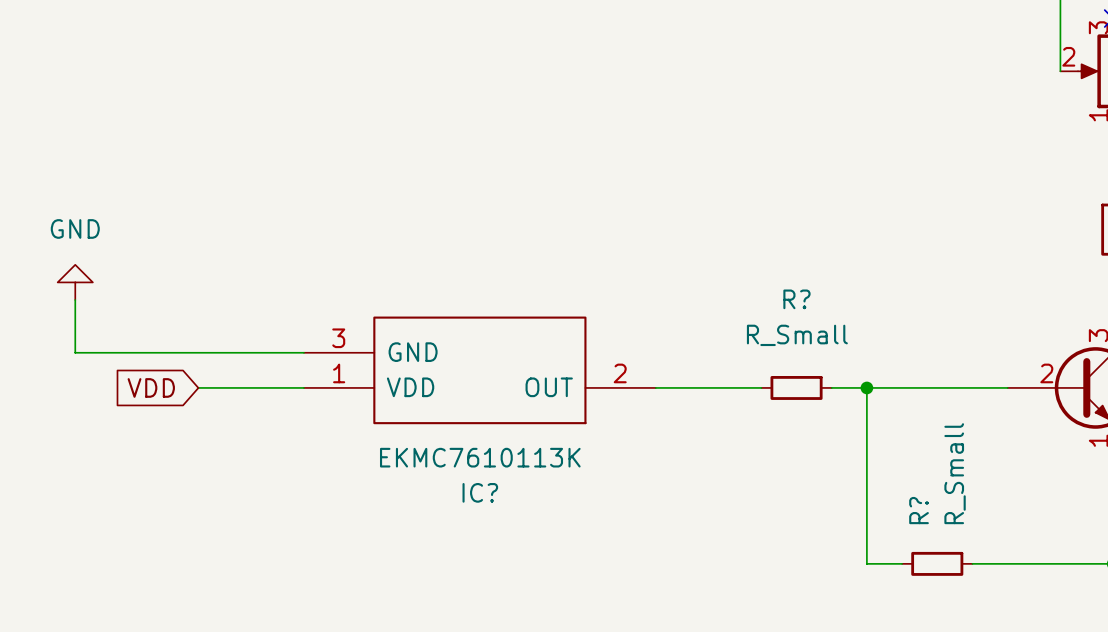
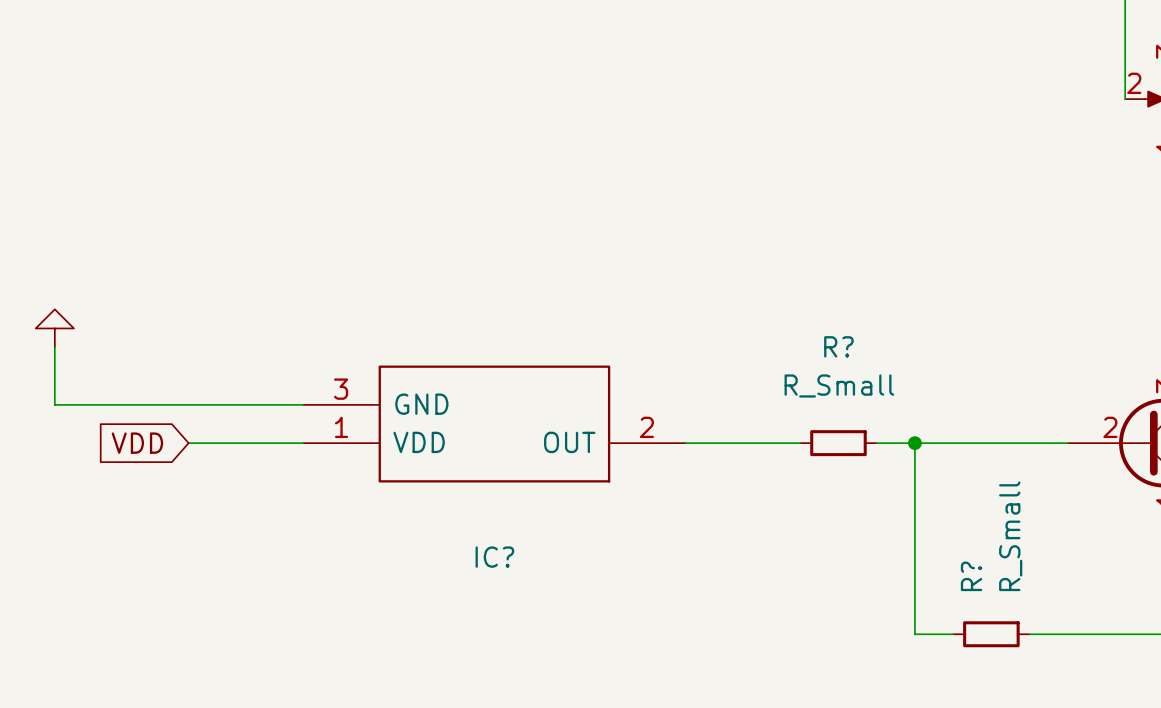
power symbol text: GND (75, 228) -> none
IC? value: EKMC7610113K (480, 457) -> none

